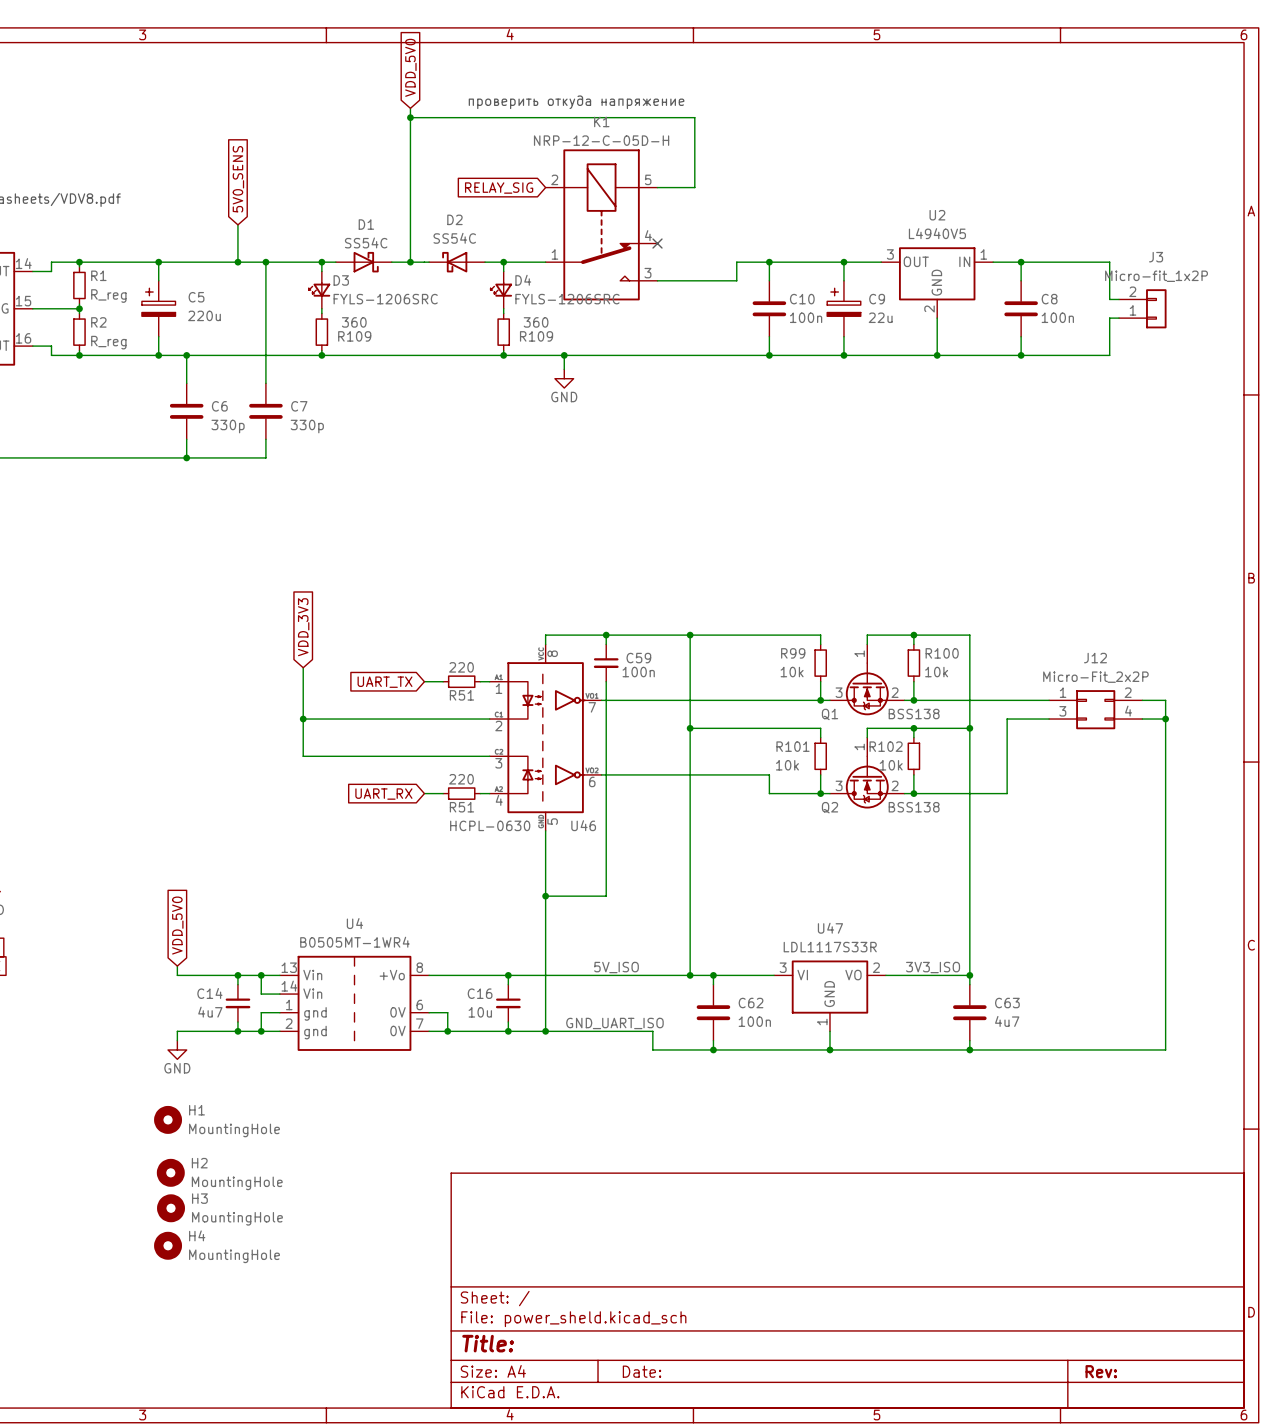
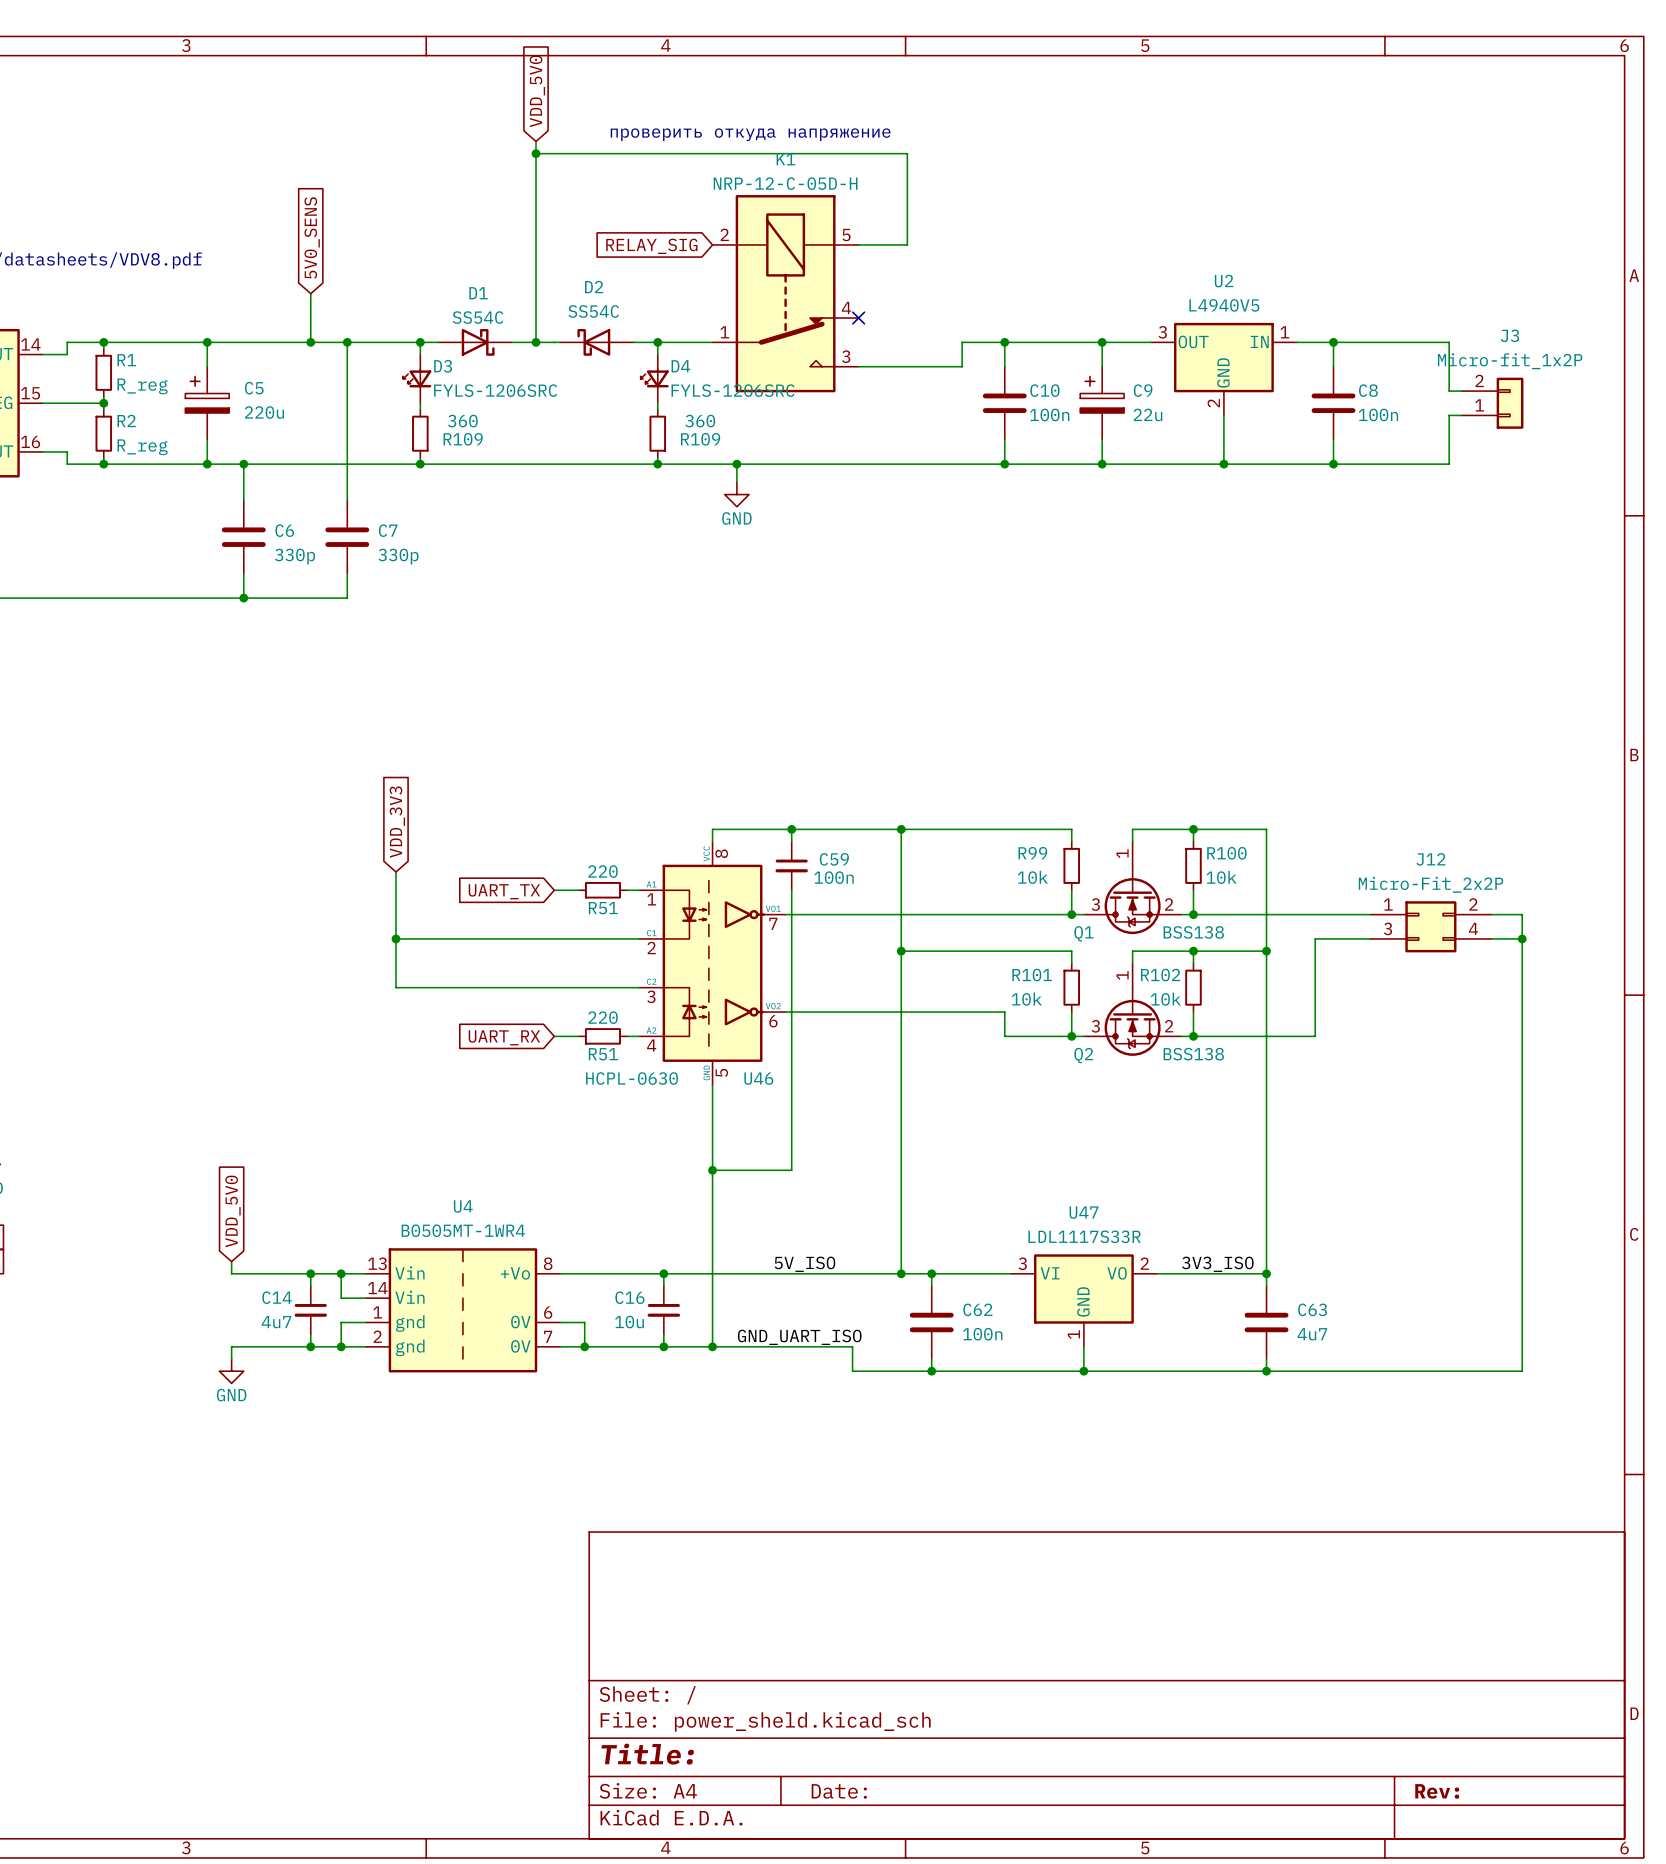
H1: MountingHole (168, 1119) -> none
H2: MountingHole (170, 1172) -> none
H3: MountingHole (171, 1208) -> none
H4: MountingHole (168, 1245) -> none

